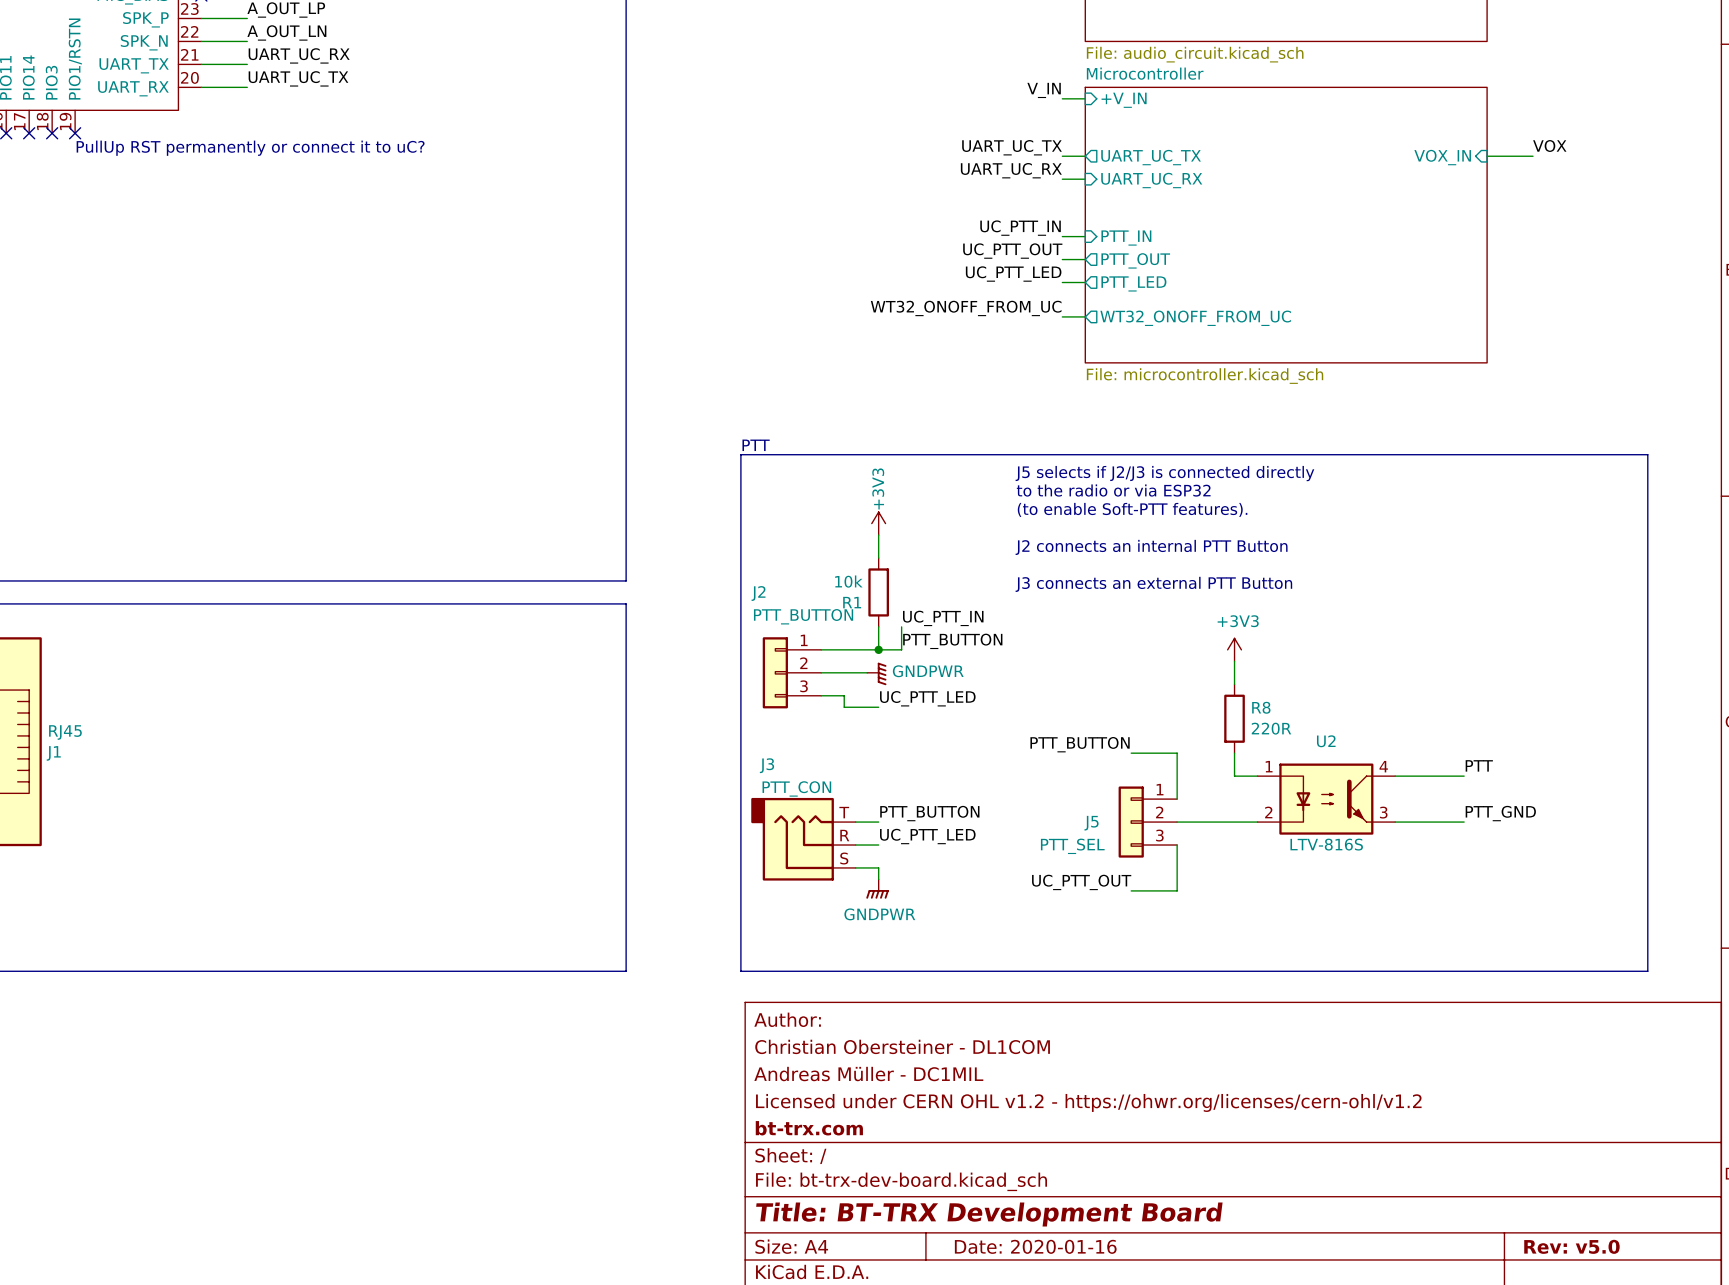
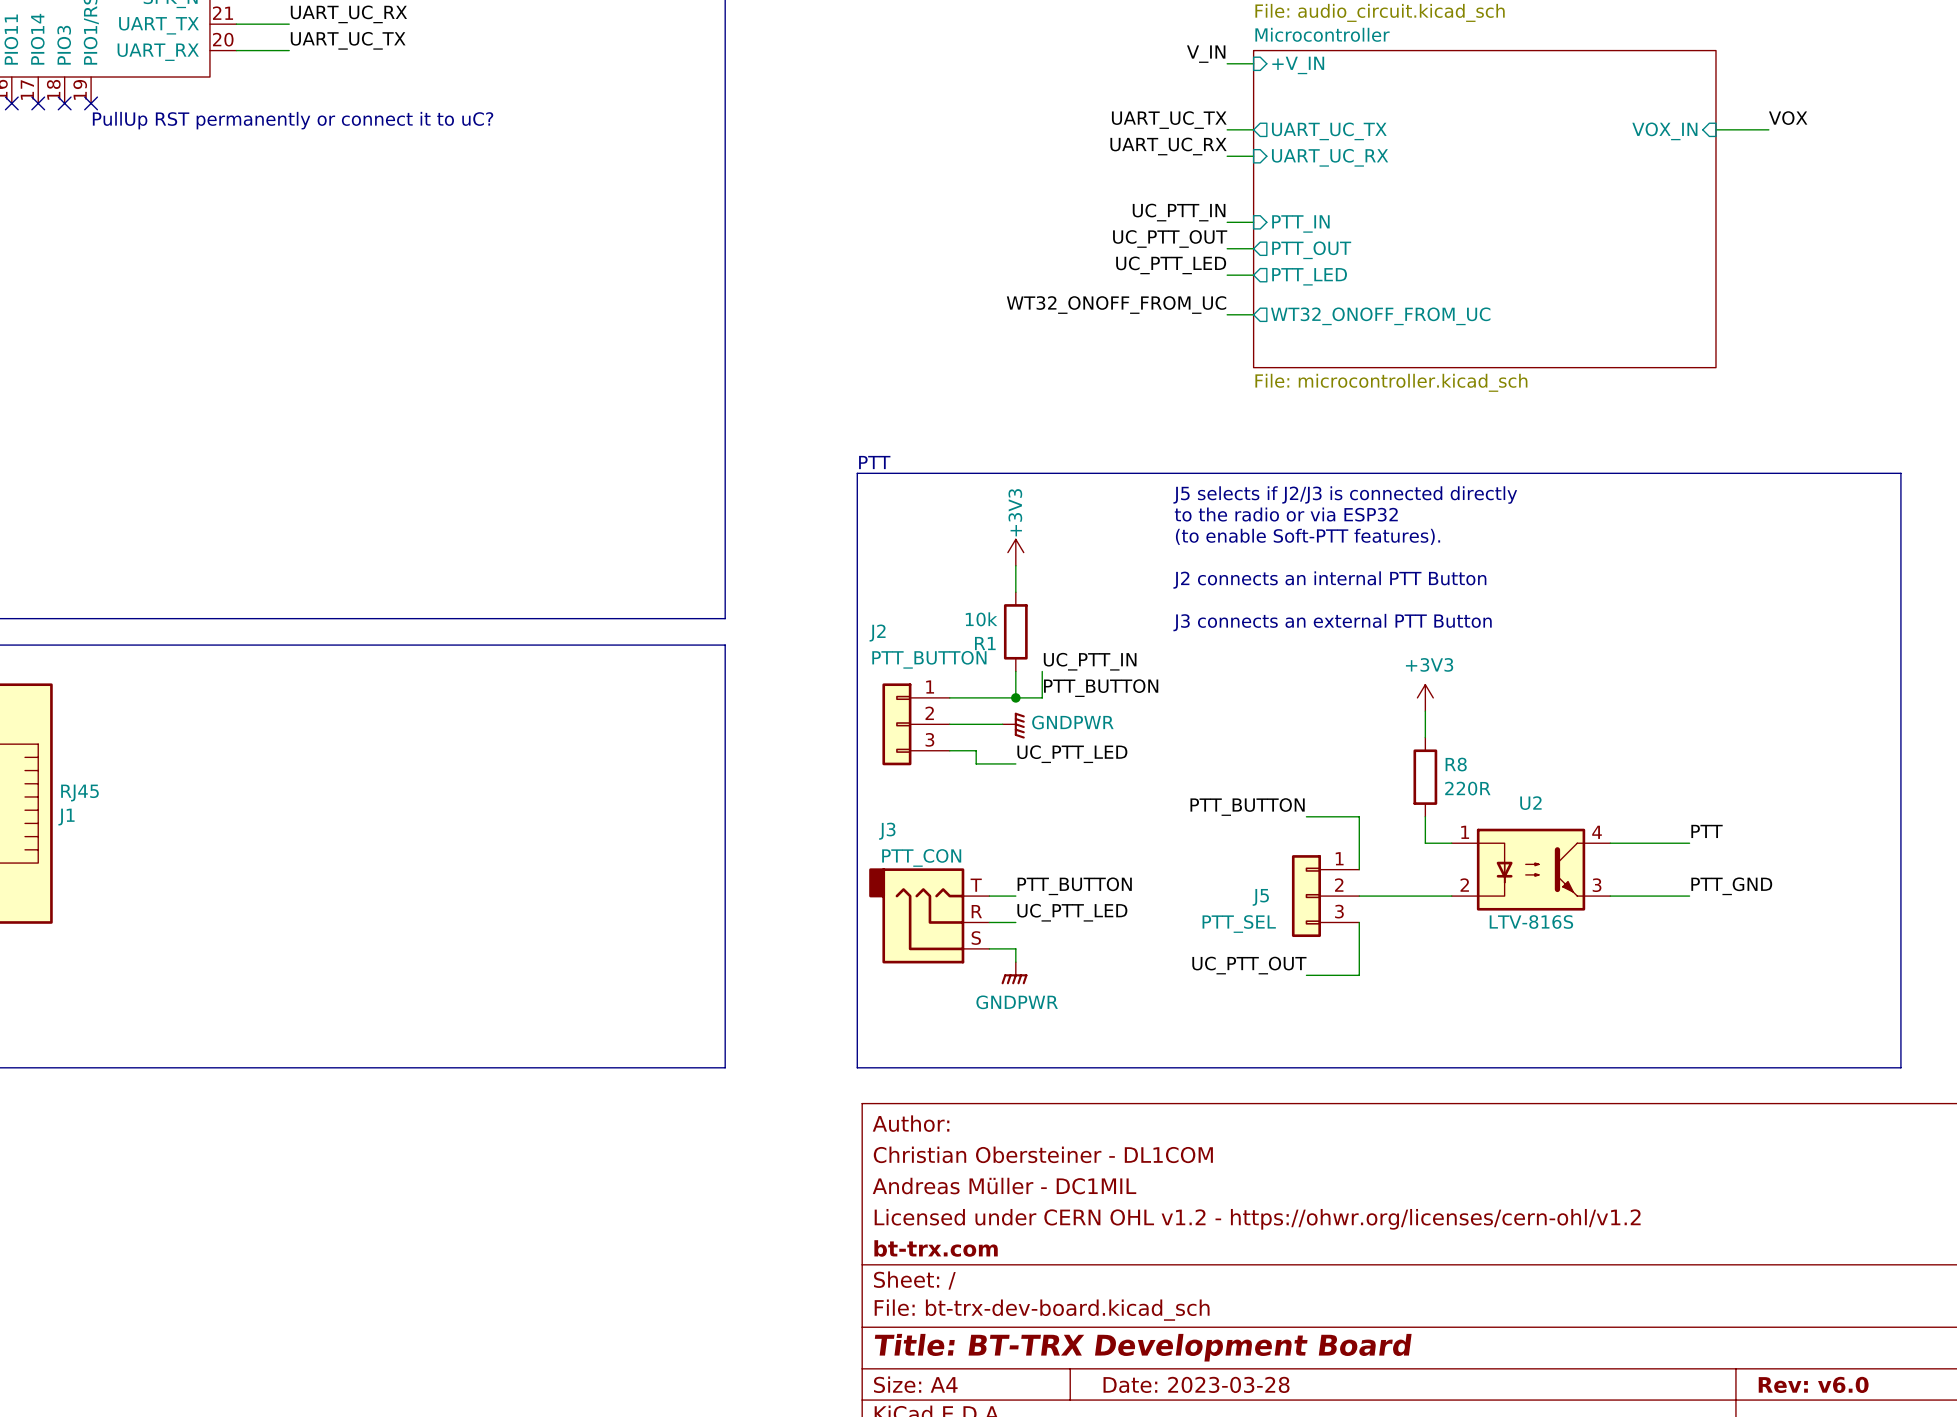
title block: Date: 2020-01-16 (1035, 1246) -> Date: 2023-03-28 (1196, 1384)
title block: Rev: v5.0 (1571, 1246) -> Rev: v6.0 (1813, 1384)

